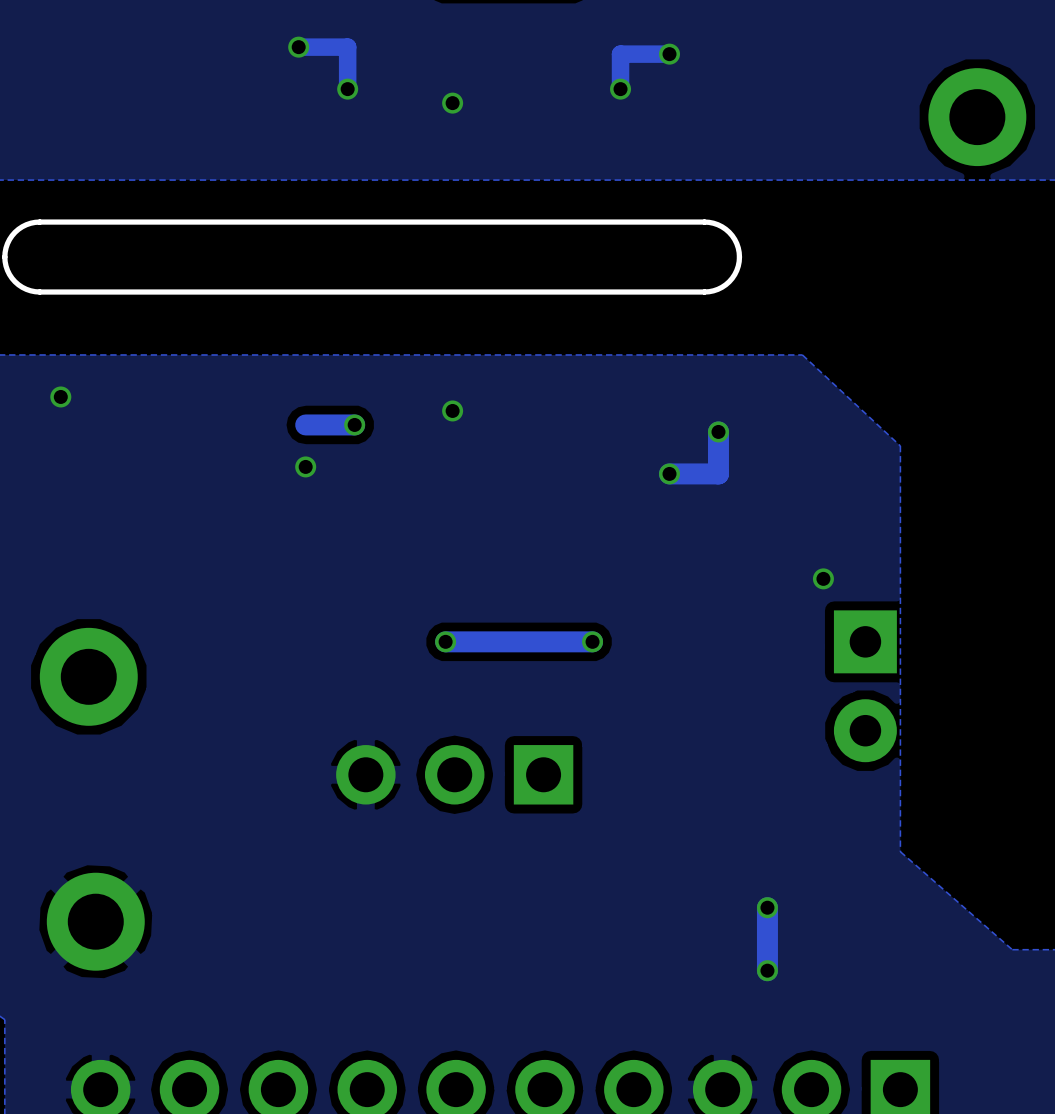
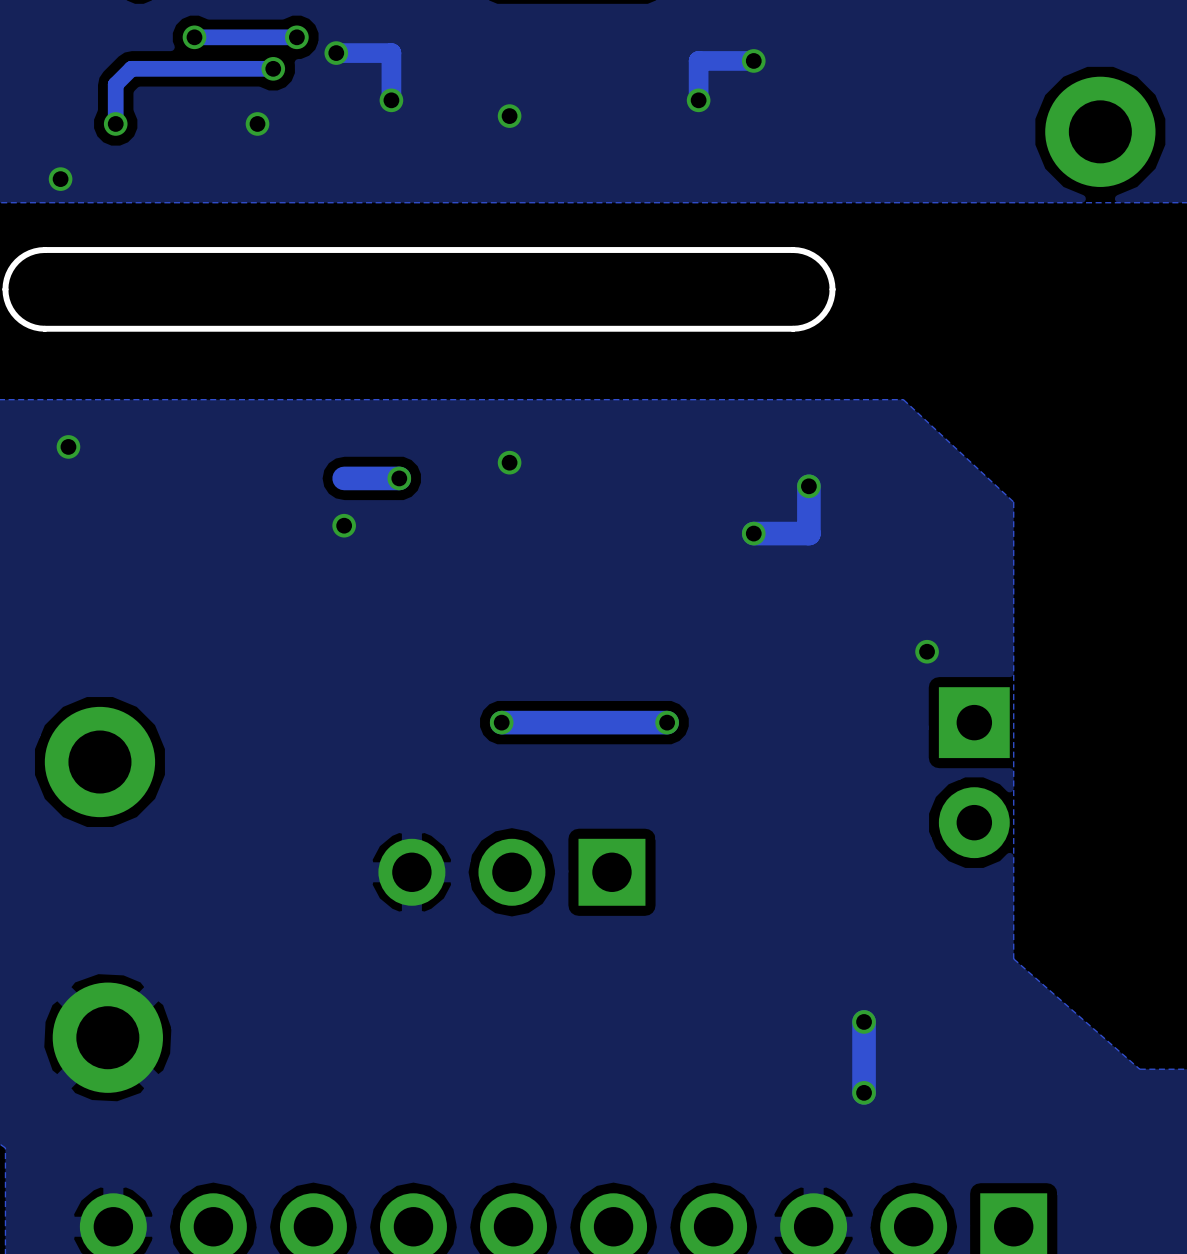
via: none -> (194, 37)
track: none -> (296, 37) (194, 37)
via: none -> (296, 37)
track: none -> (273, 68) (131, 68) (115, 84) (115, 123)
via: none -> (273, 68)
via: none -> (115, 123)
via: none -> (257, 123)
via: none -> (60, 179)

